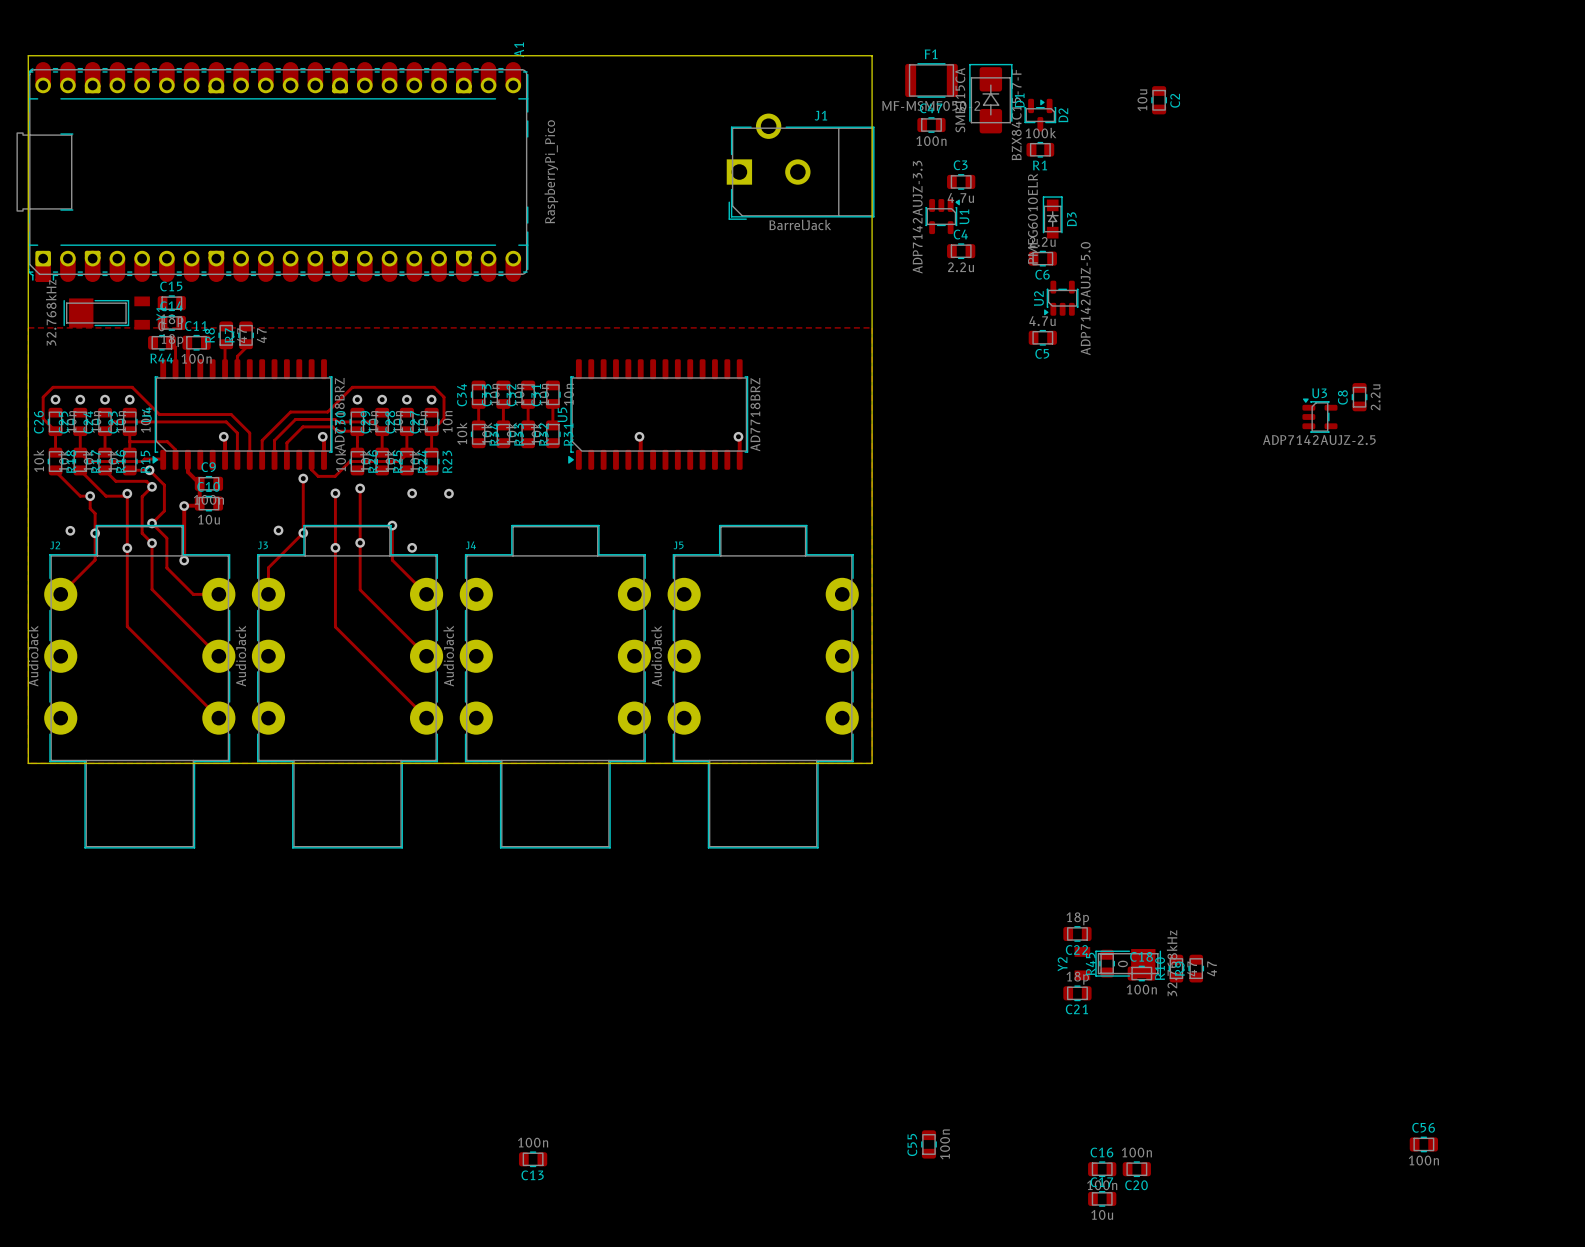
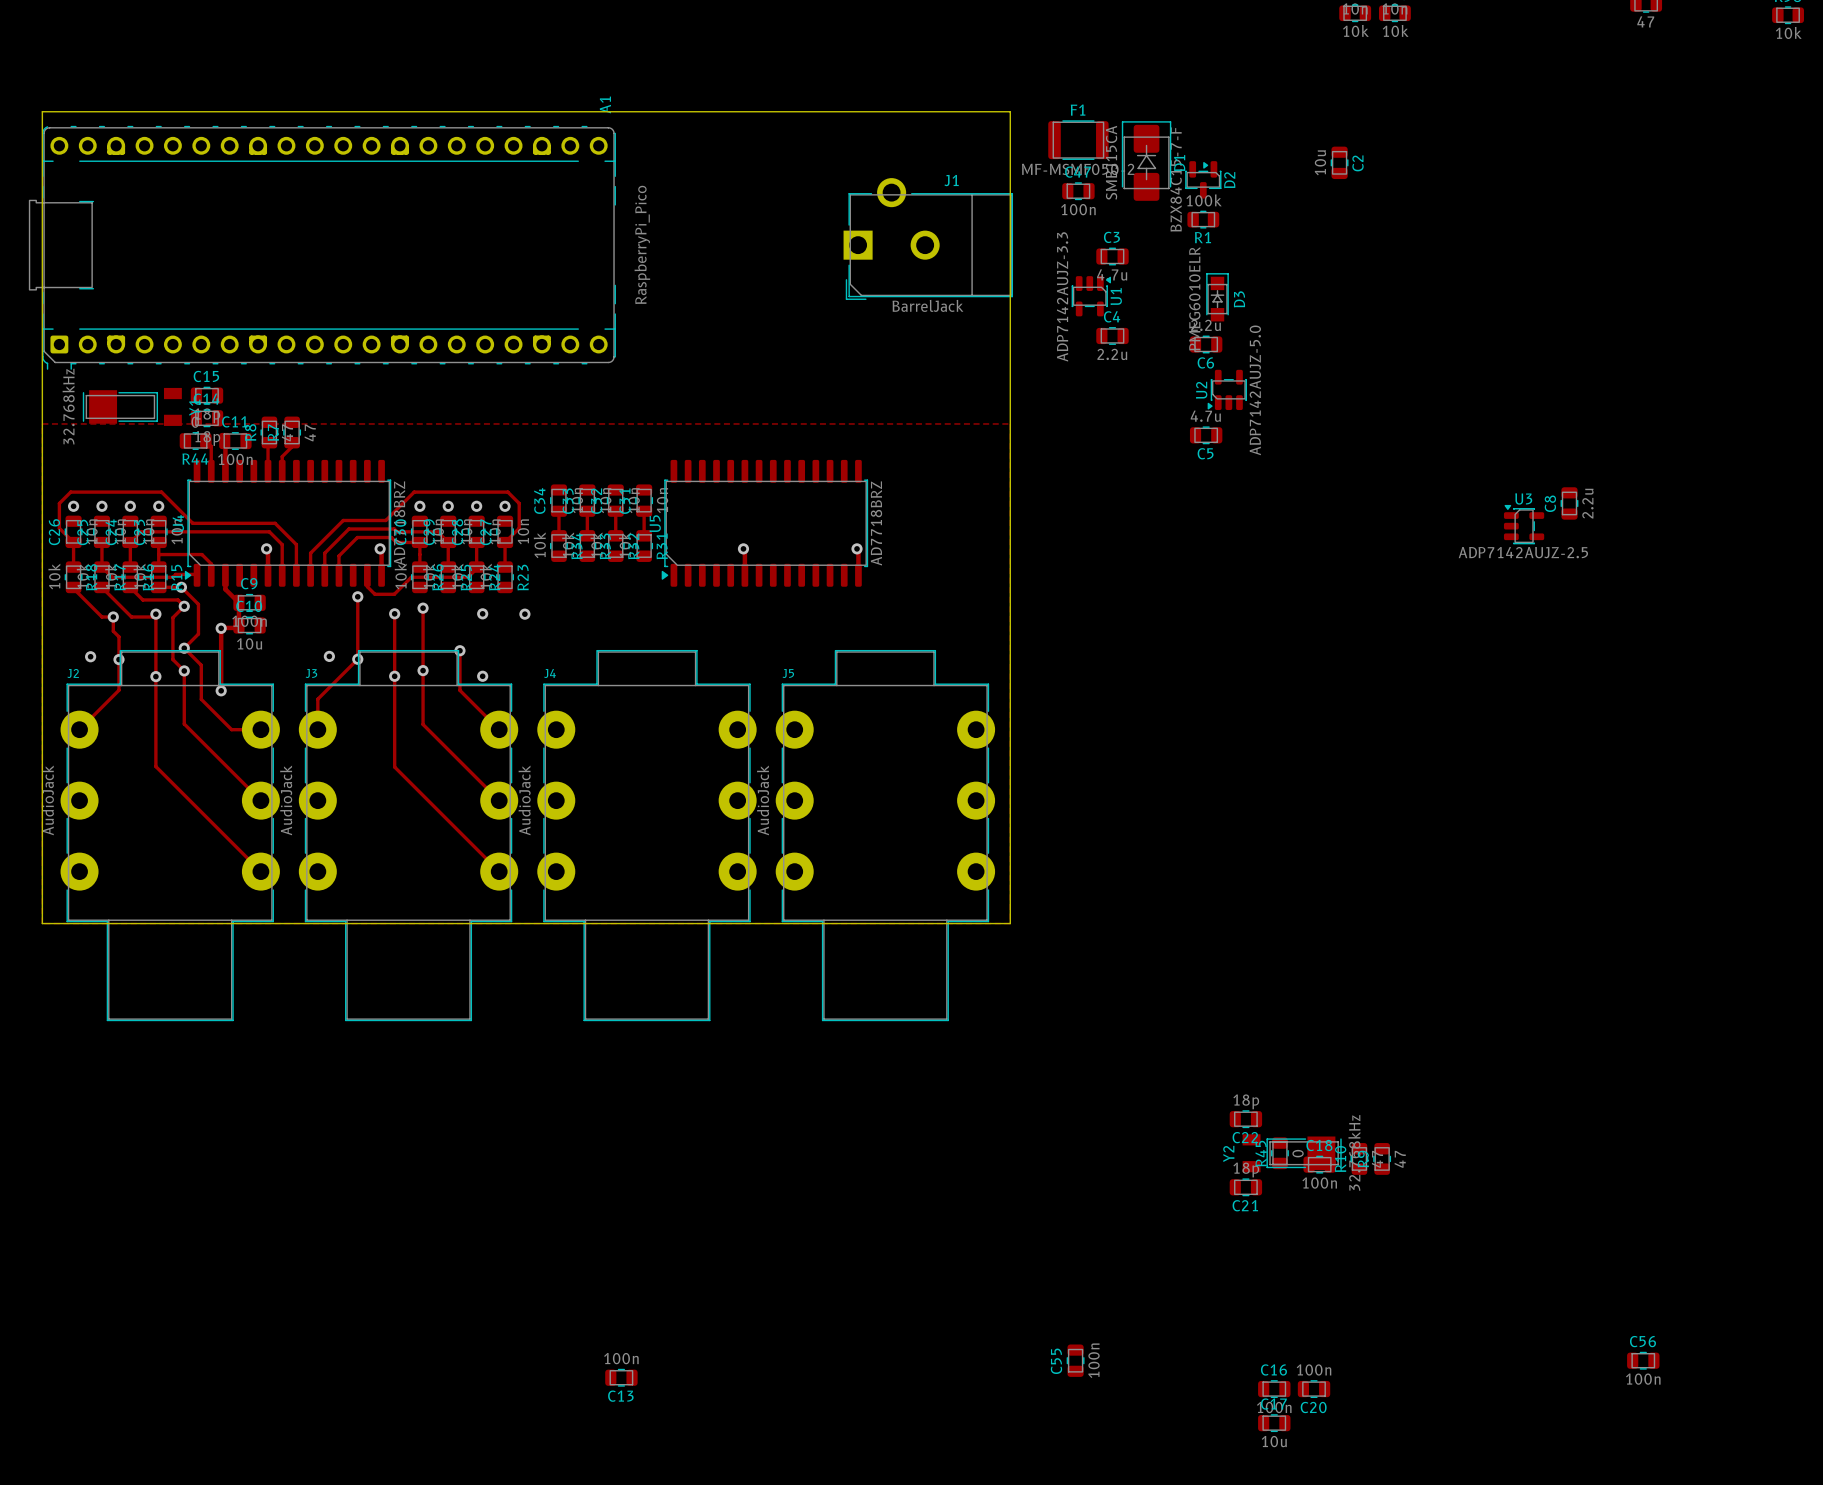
A1 footprint: [16, 62, 529, 283] -> [28, 125, 616, 370]

